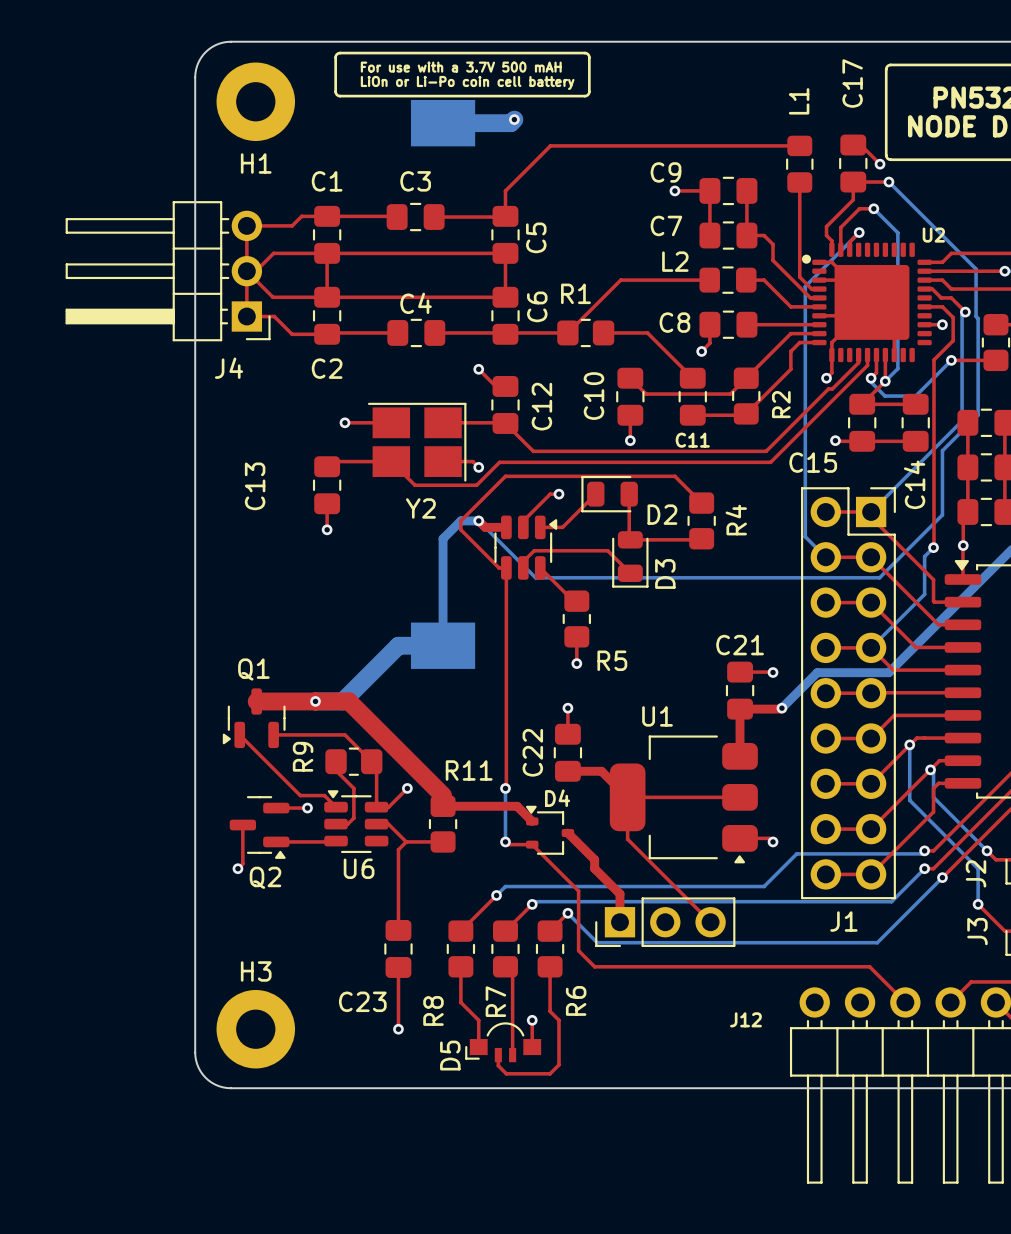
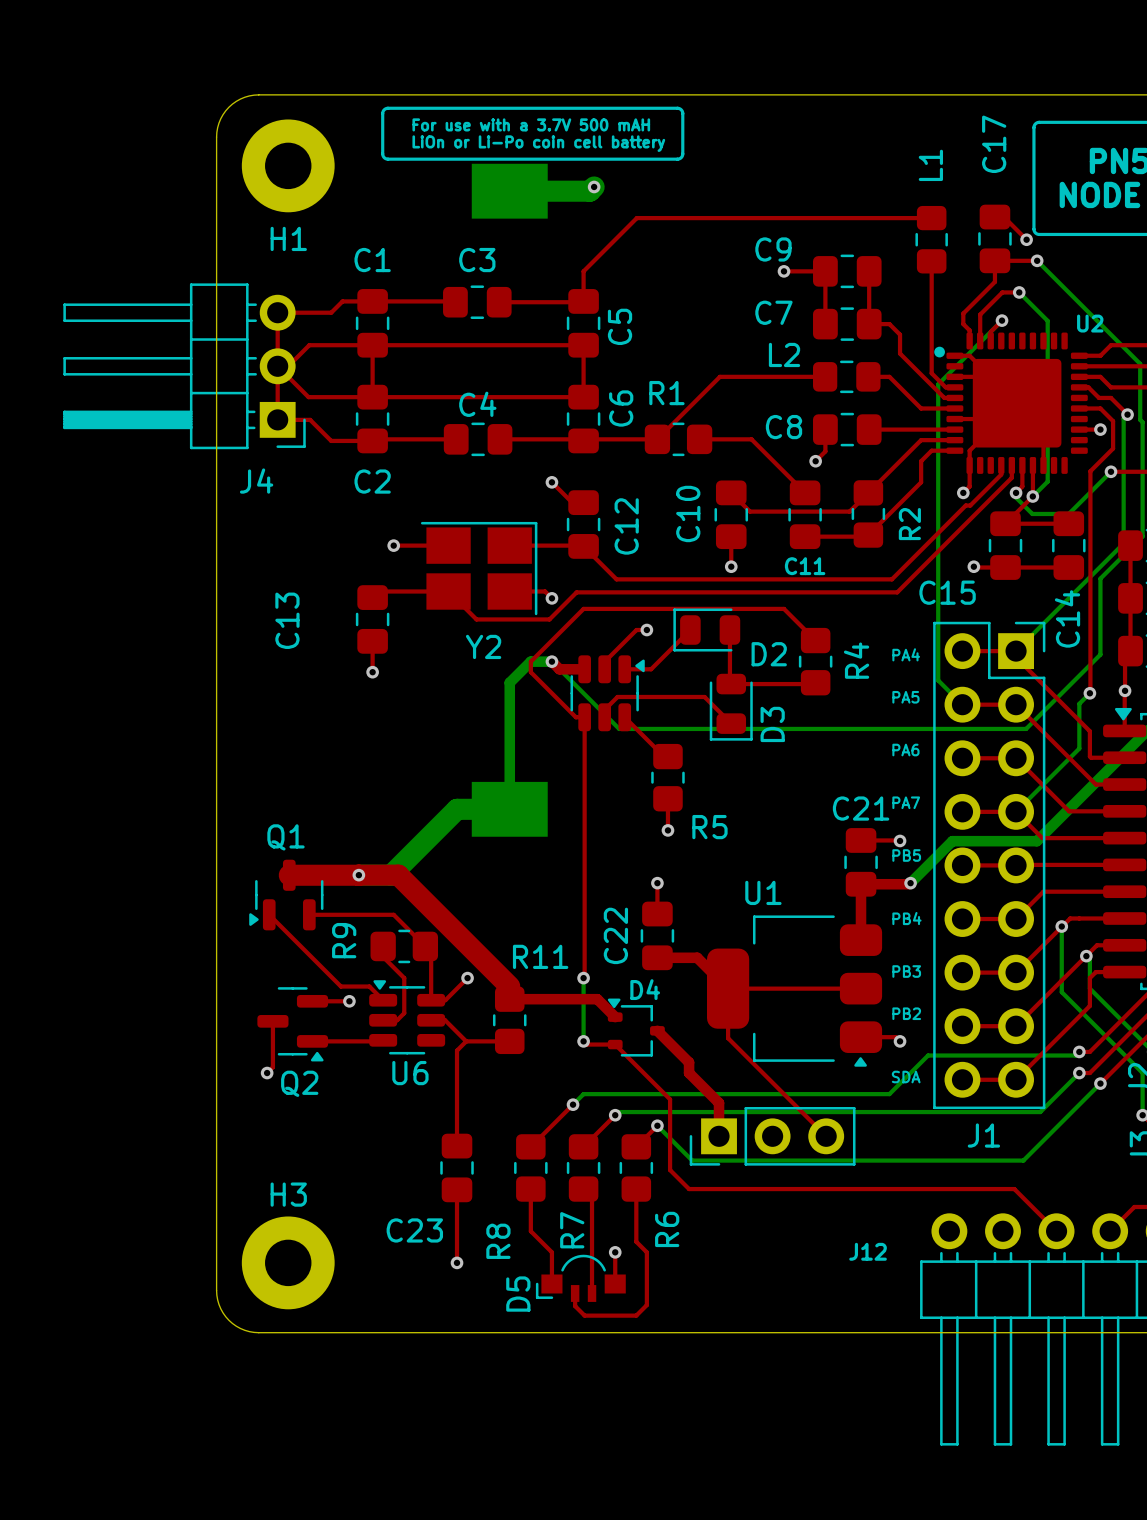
text: none -> PA4 (906, 654)
text: none -> PA5 (905, 697)
text: none -> PA6 (905, 750)
text: none -> PA7 (906, 802)
text: none -> PB5 (906, 855)
text: none -> PB4 (906, 918)
text: none -> PB3 (906, 971)
text: none -> PB2 (906, 1013)
text: none -> SDA (906, 1077)

